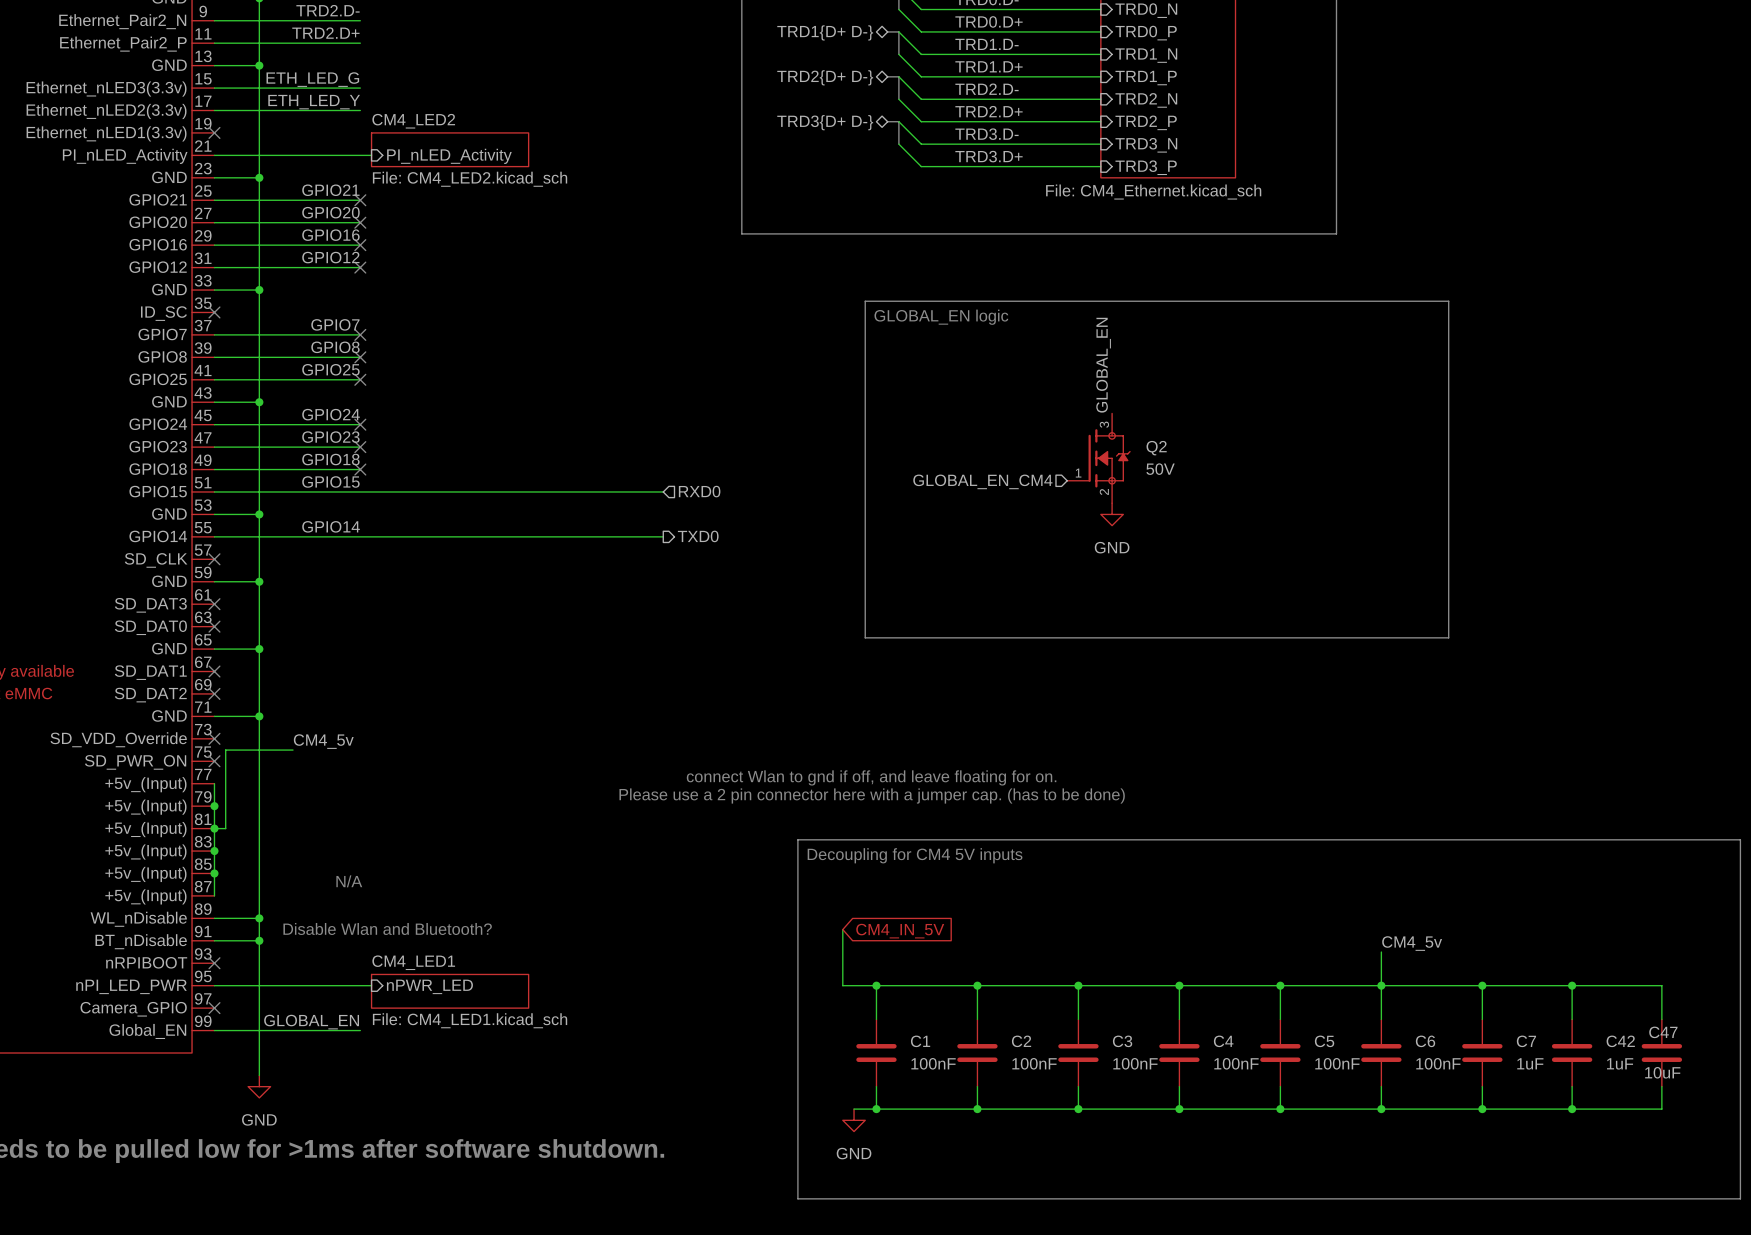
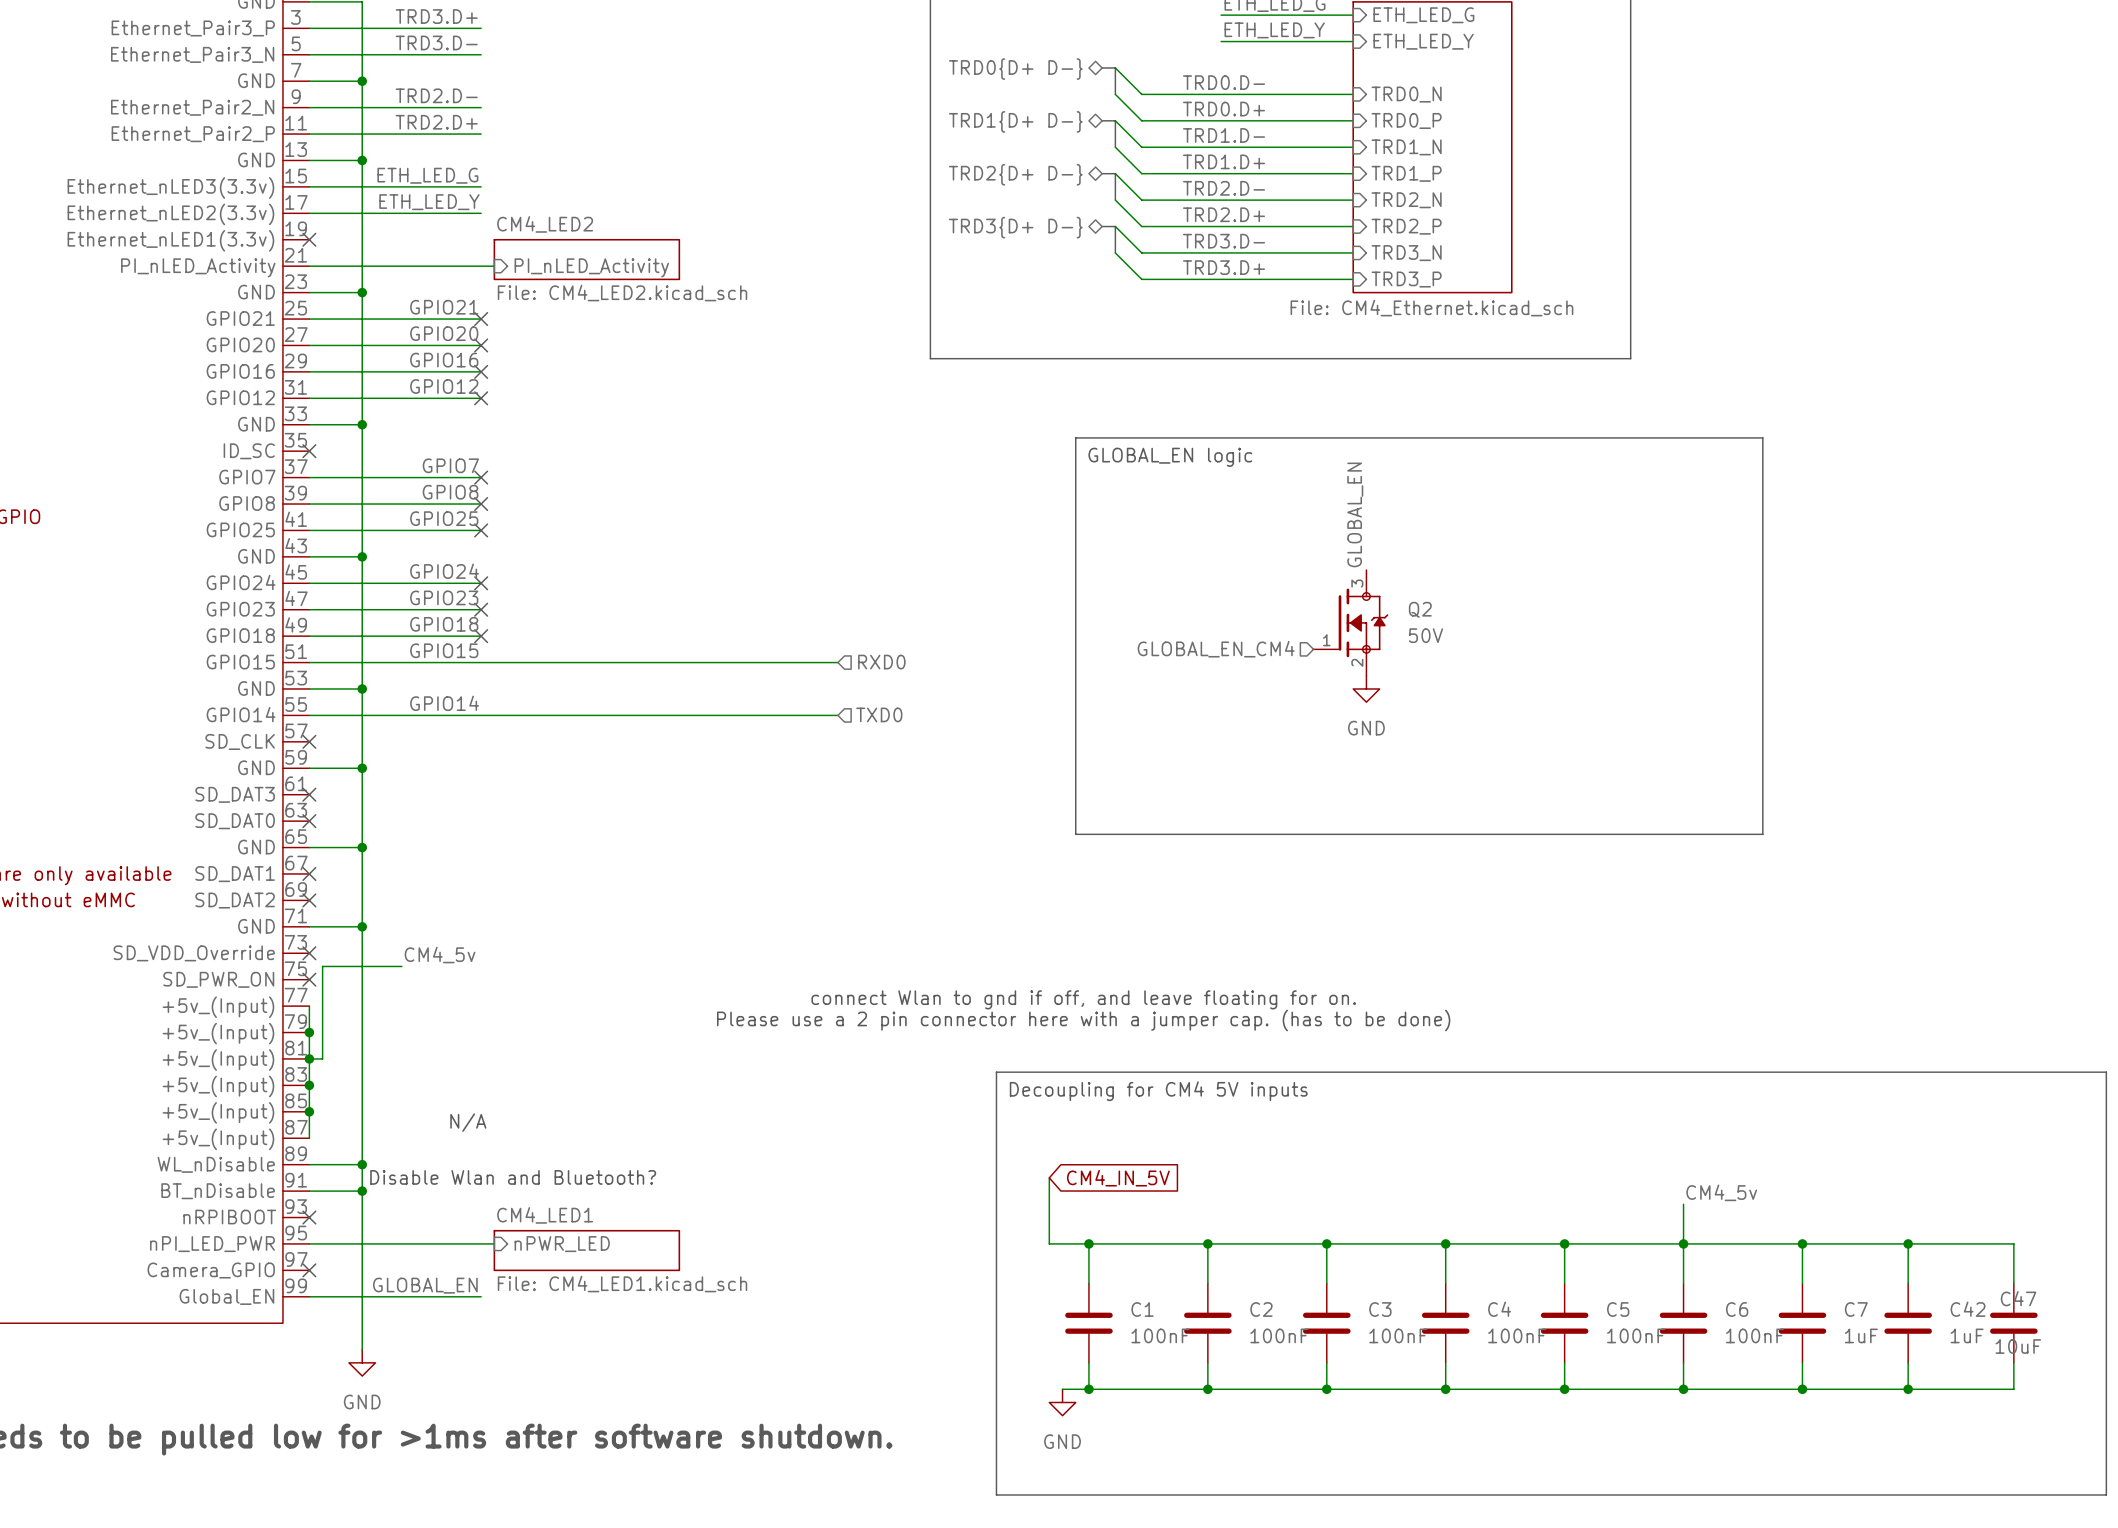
hierarchical label shape: output (698, 536) -> input (879, 714)

